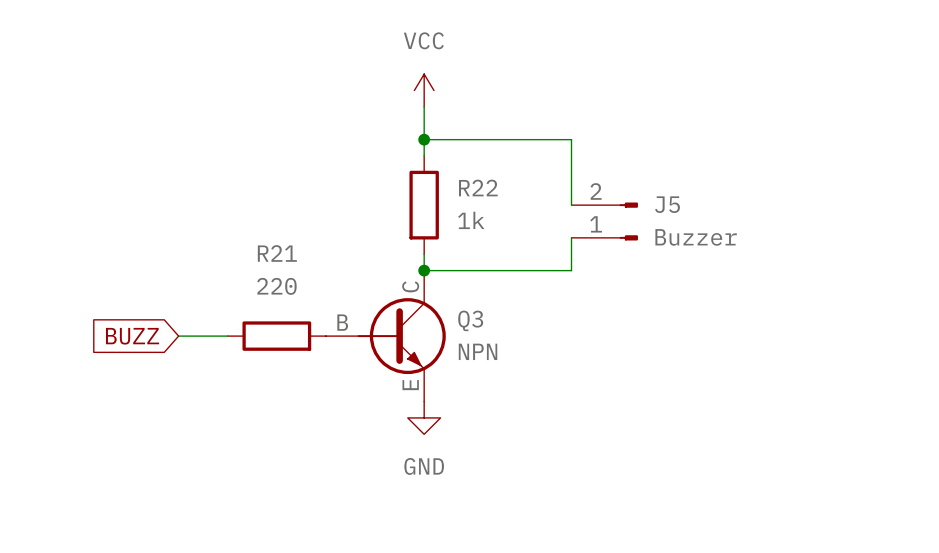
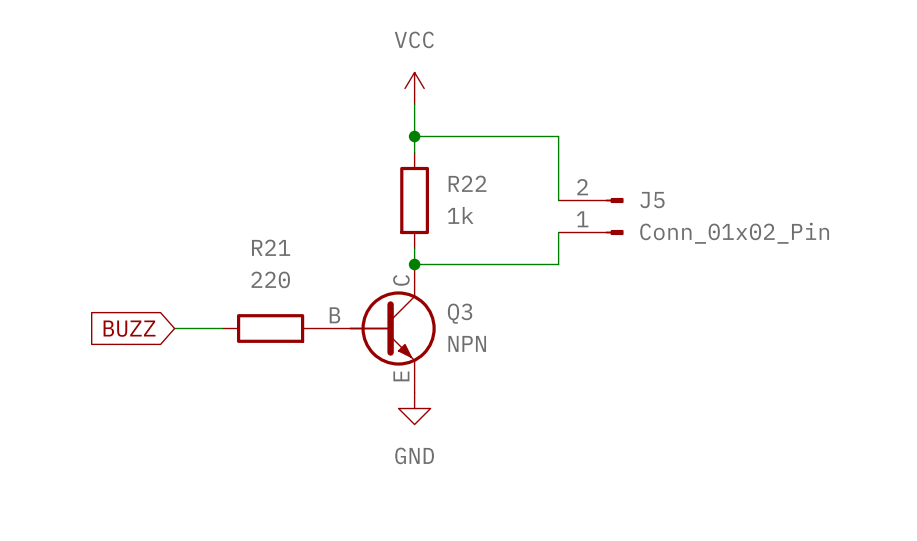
J5 value: Buzzer (696, 237) -> Conn_01x02_Pin (734, 233)

